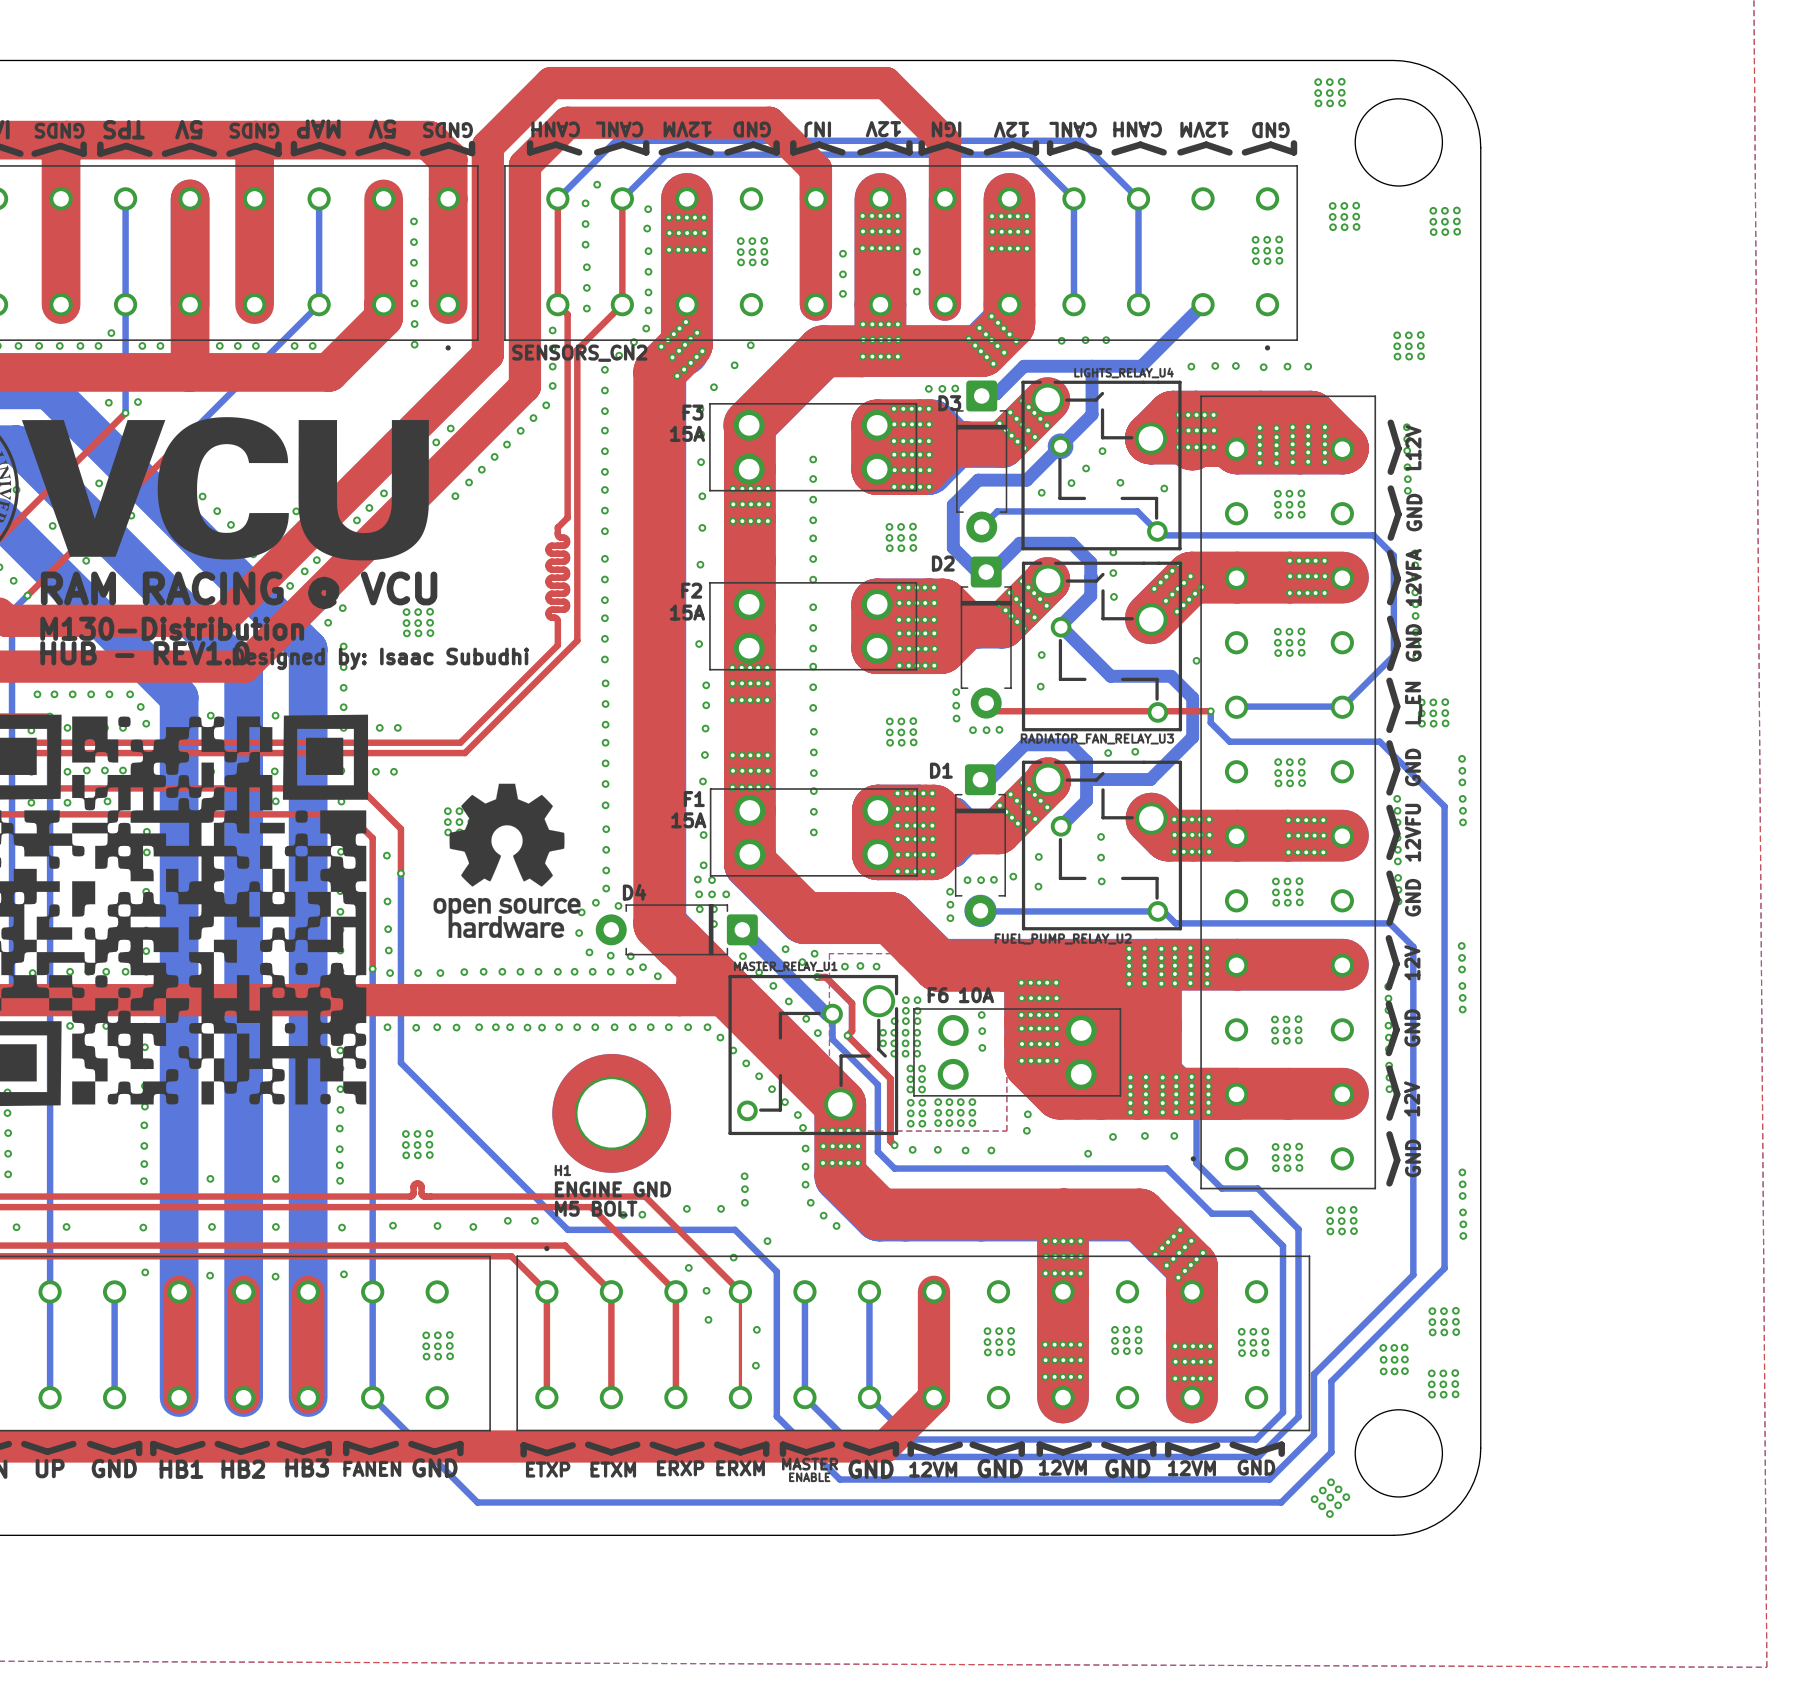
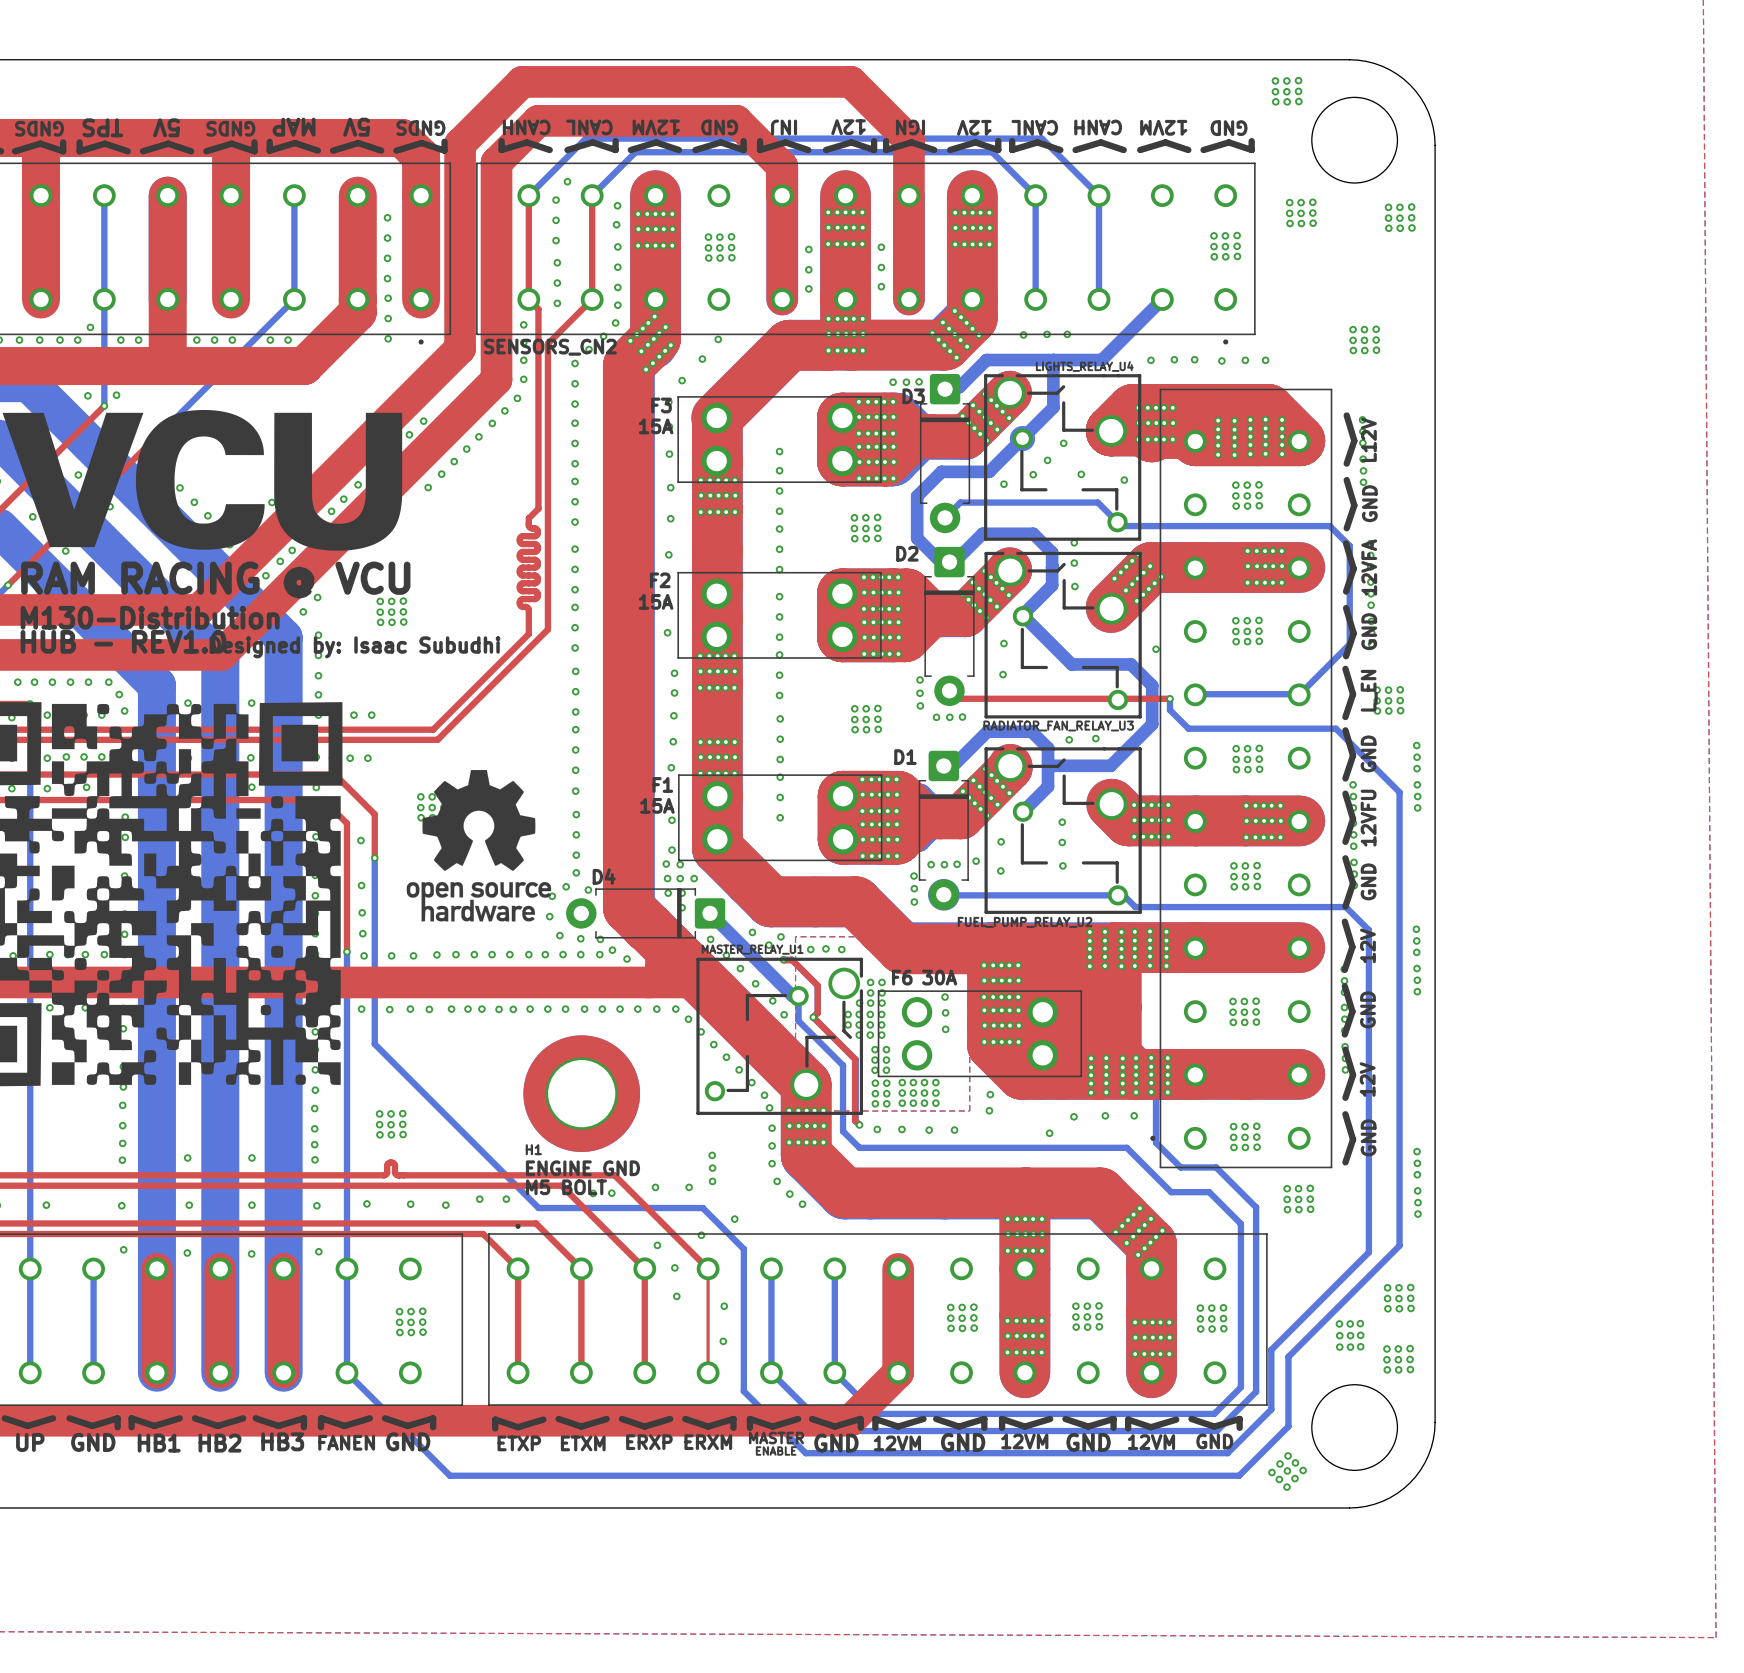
text: 10A (976, 995) -> 30A (939, 977)

